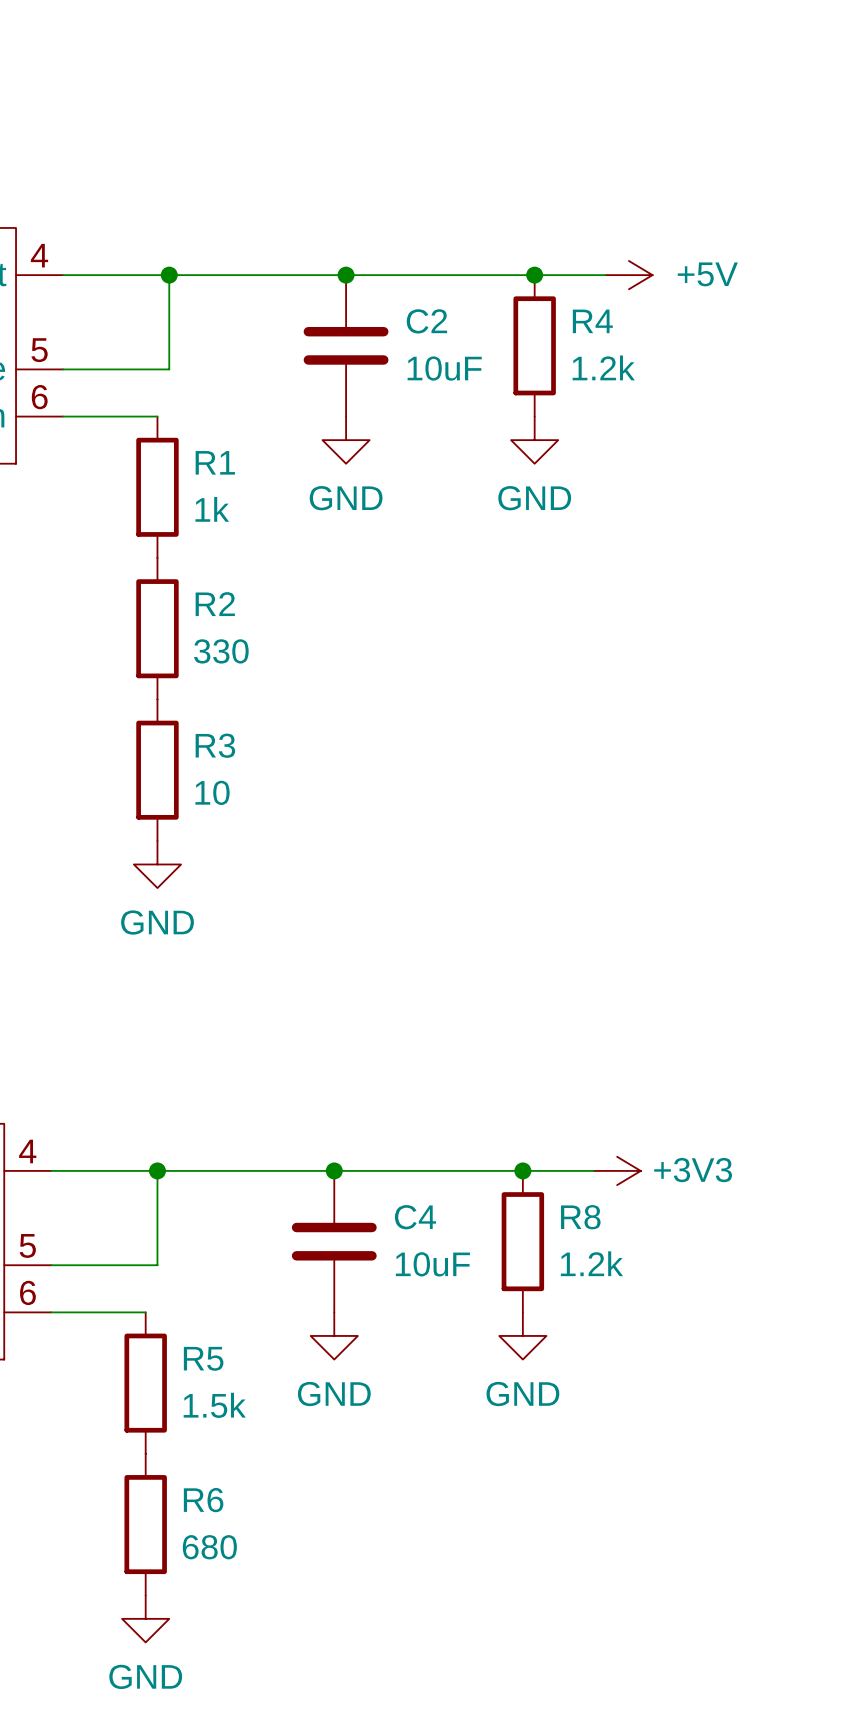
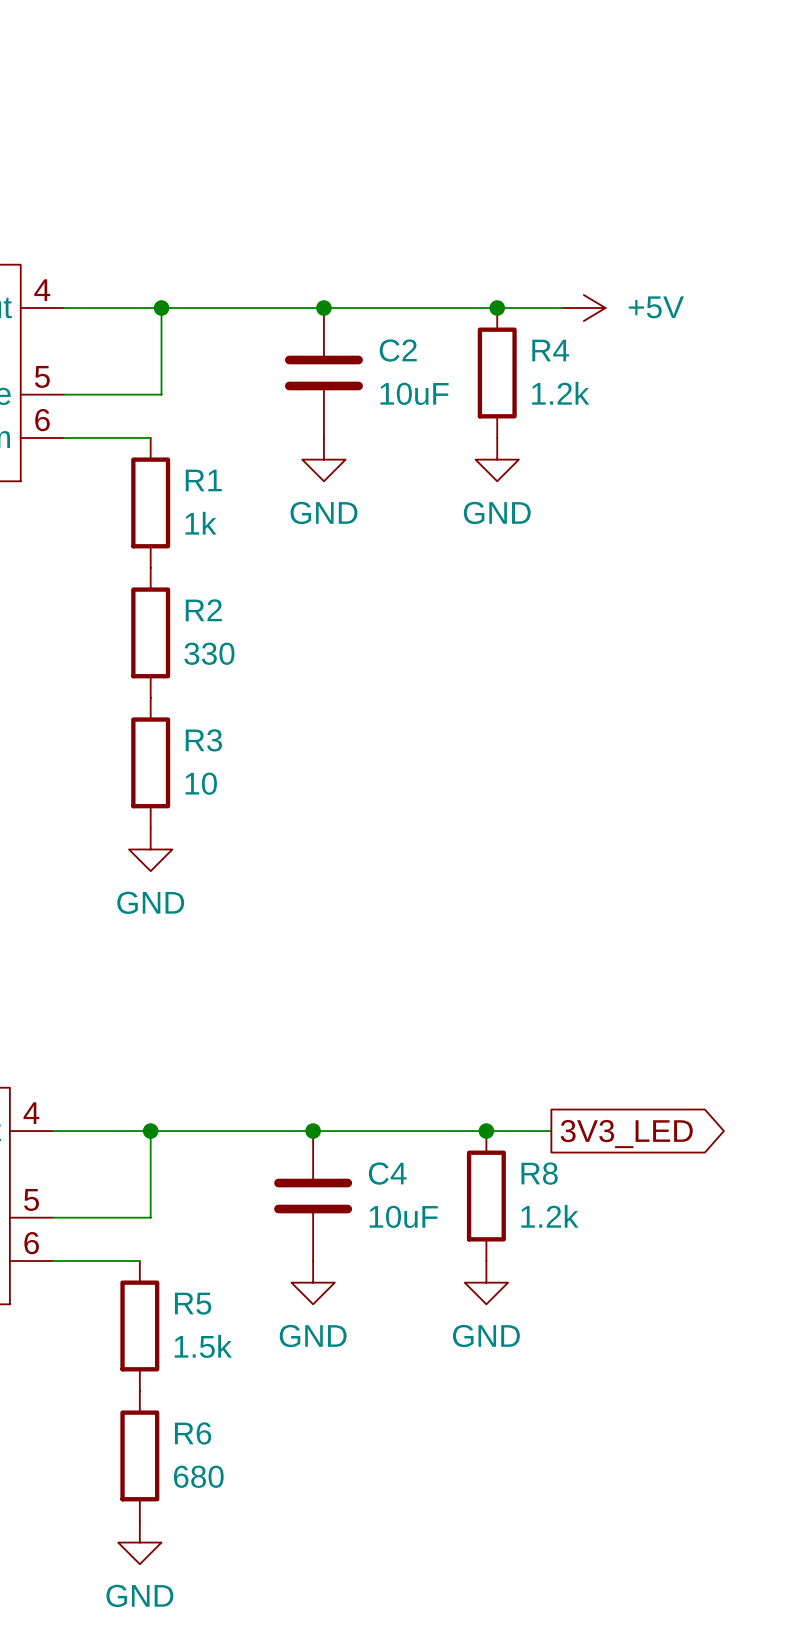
power symbol: +3V3 (617, 1170) -> none
global label: none -> 3V3_LED (626, 1134)

